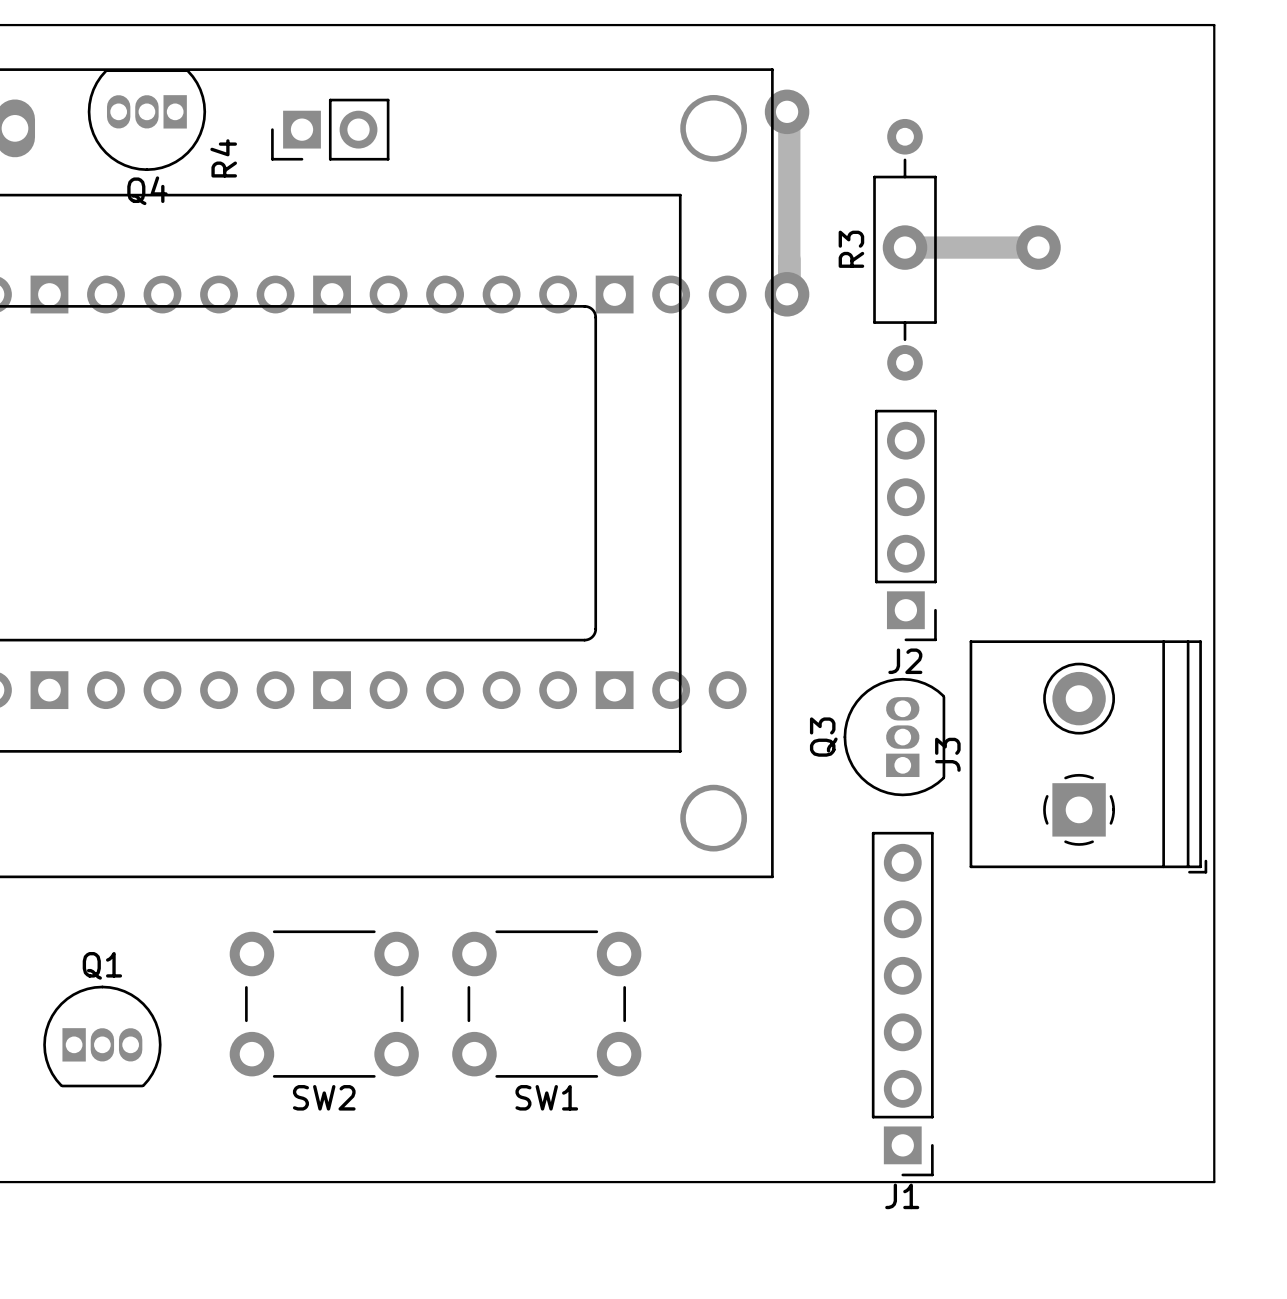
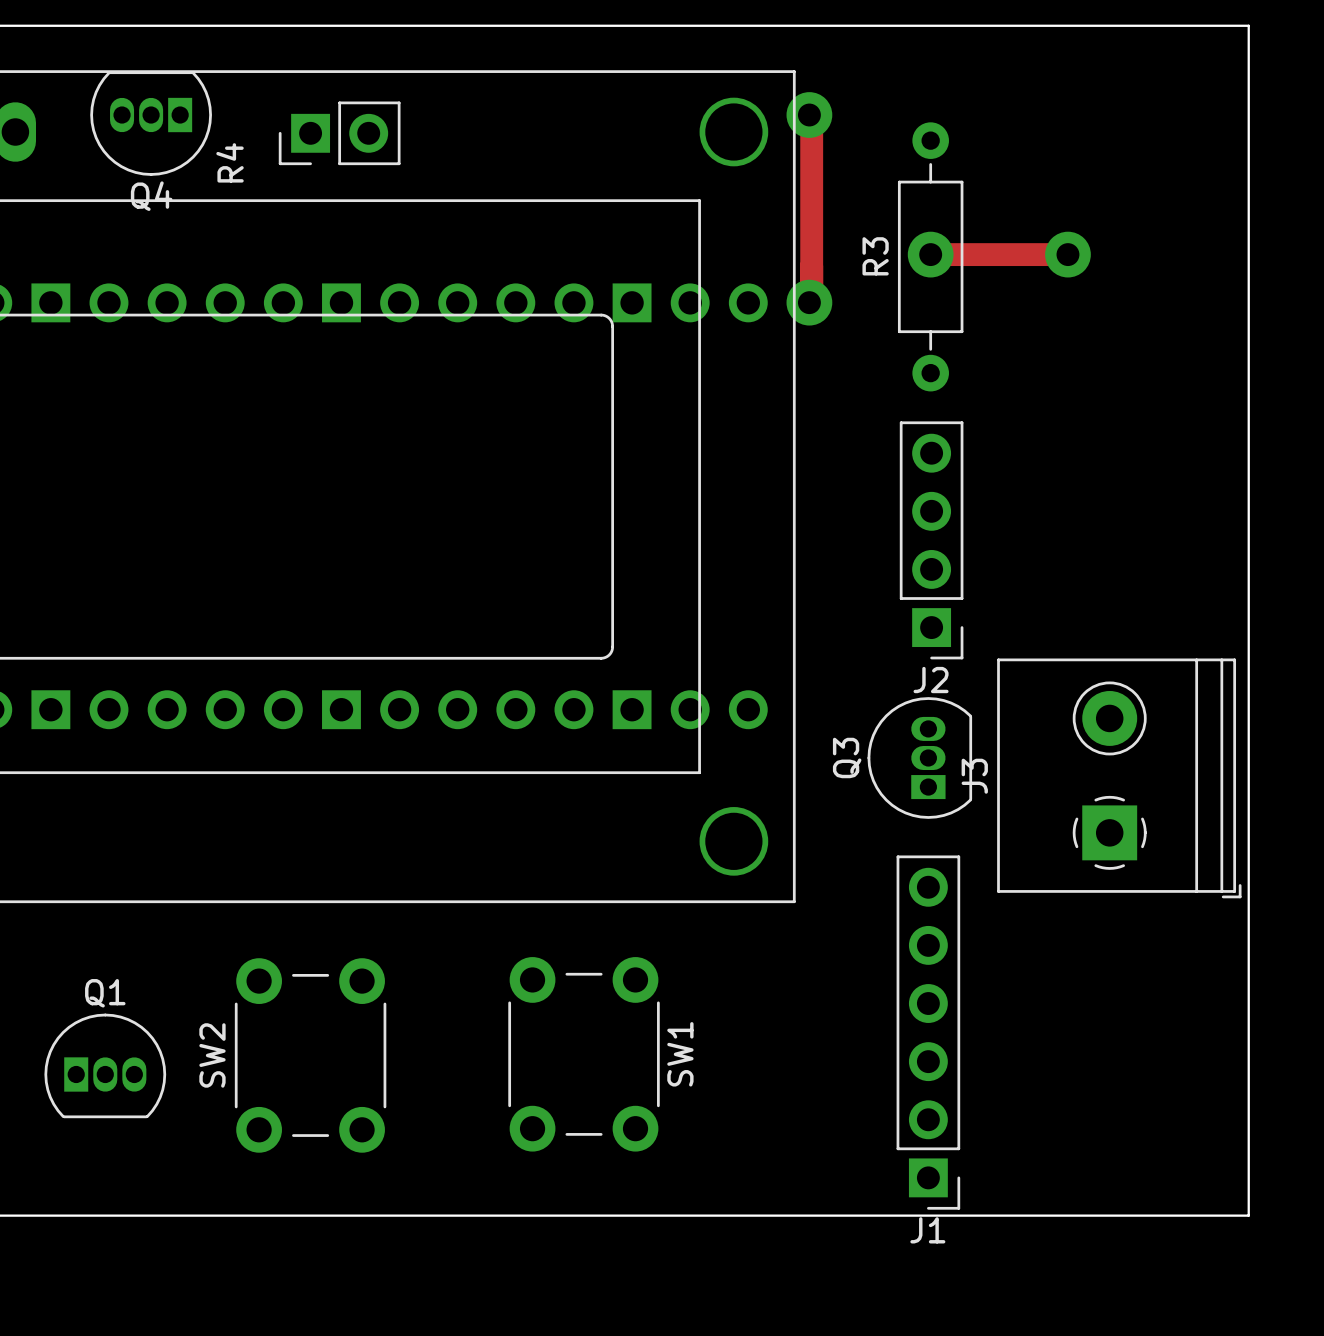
SW2 rotation: 0° (324, 1004) -> 90° clockwise (310, 1055)
SW1 rotation: 0° (546, 1004) -> 90° clockwise (584, 1054)
SW1 name position: SW1 (546, 1097) -> SW1 (680, 1054)

